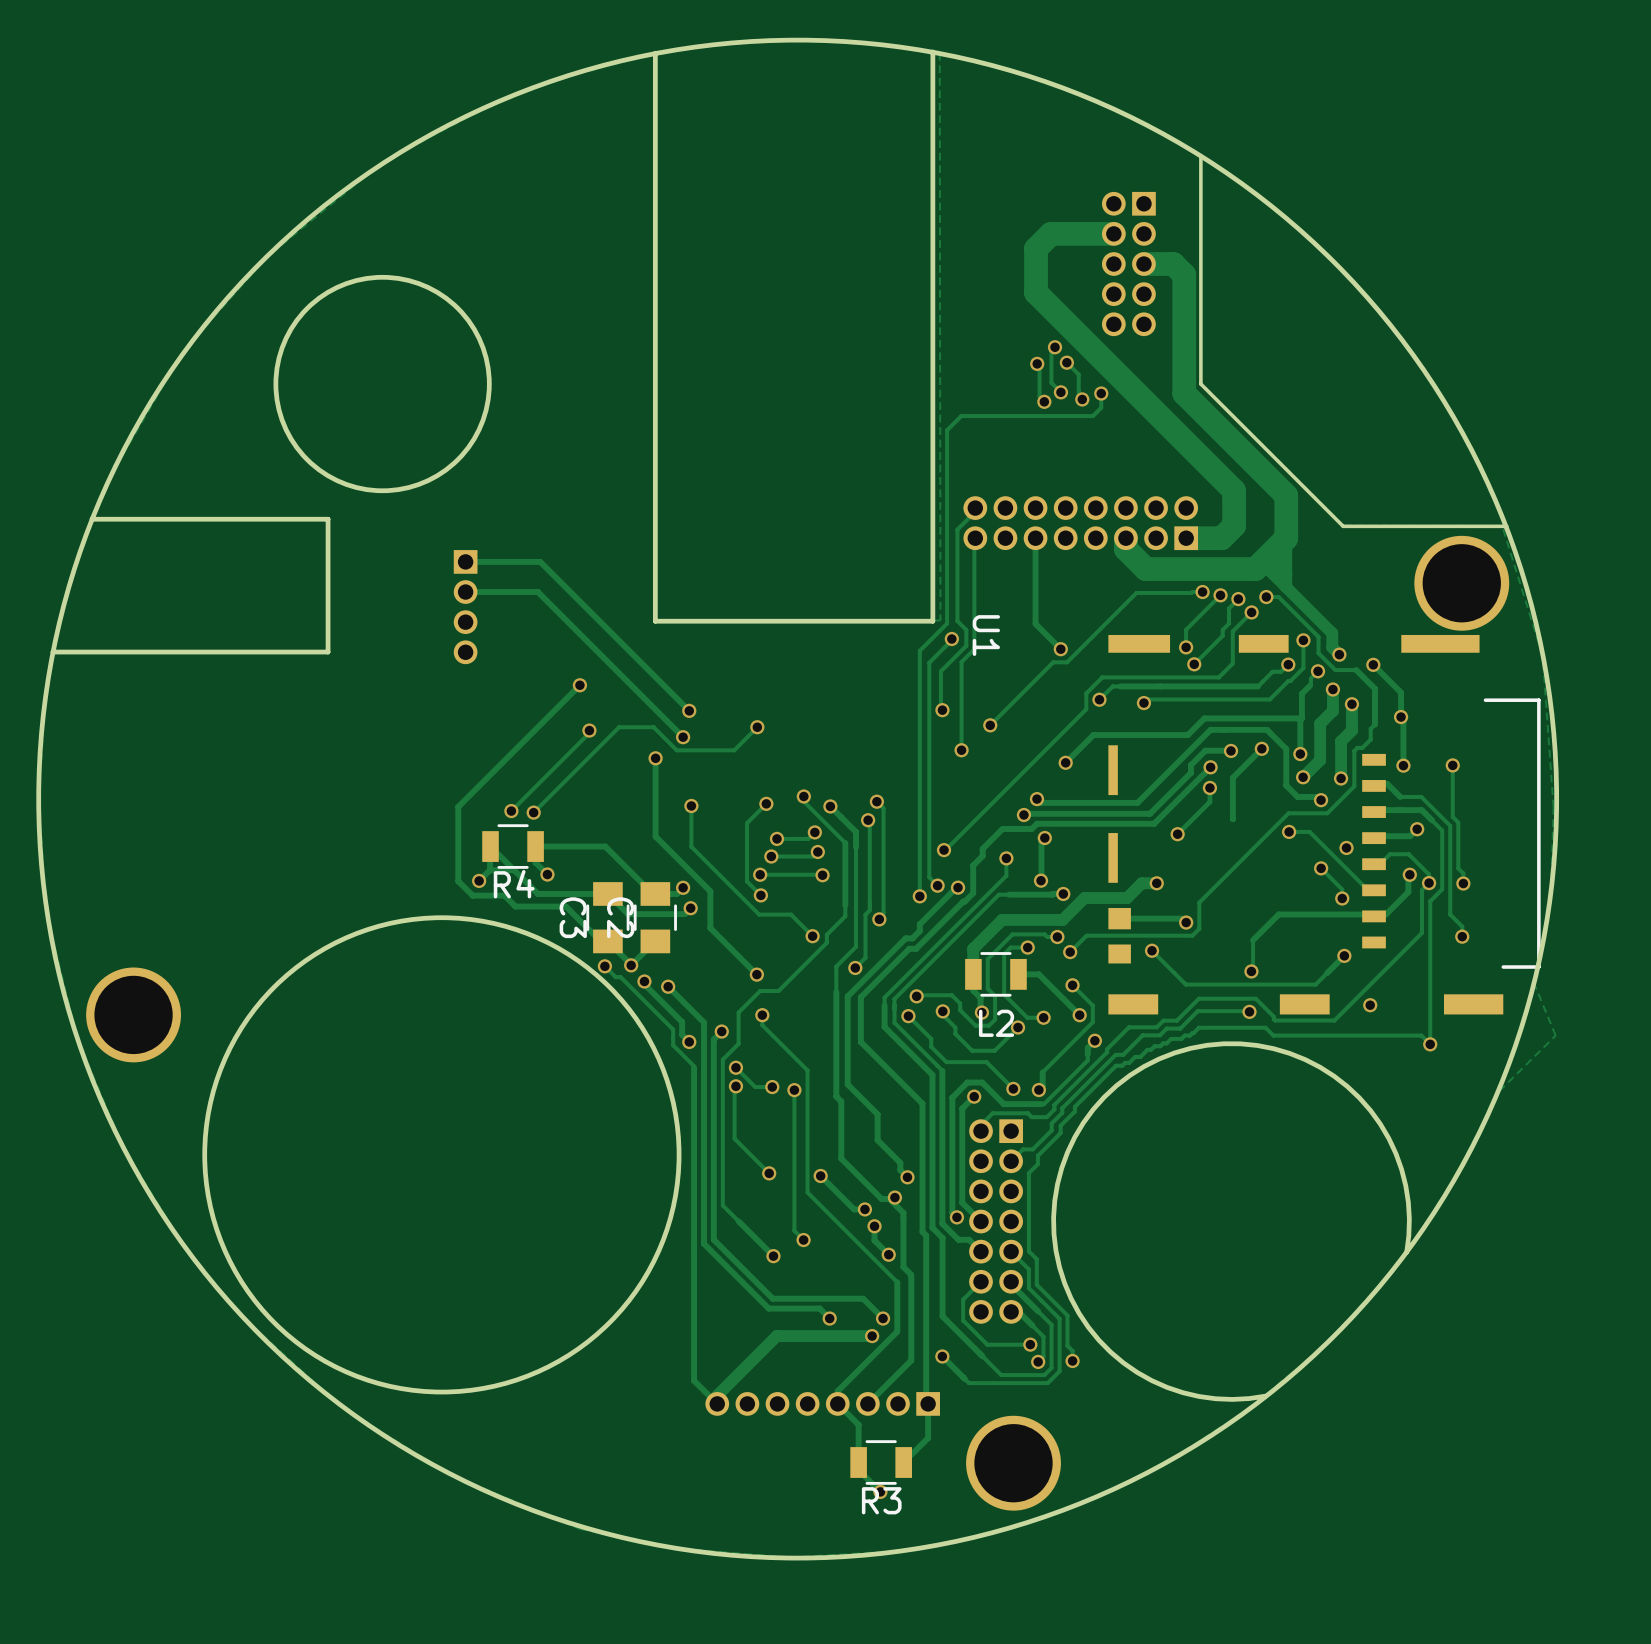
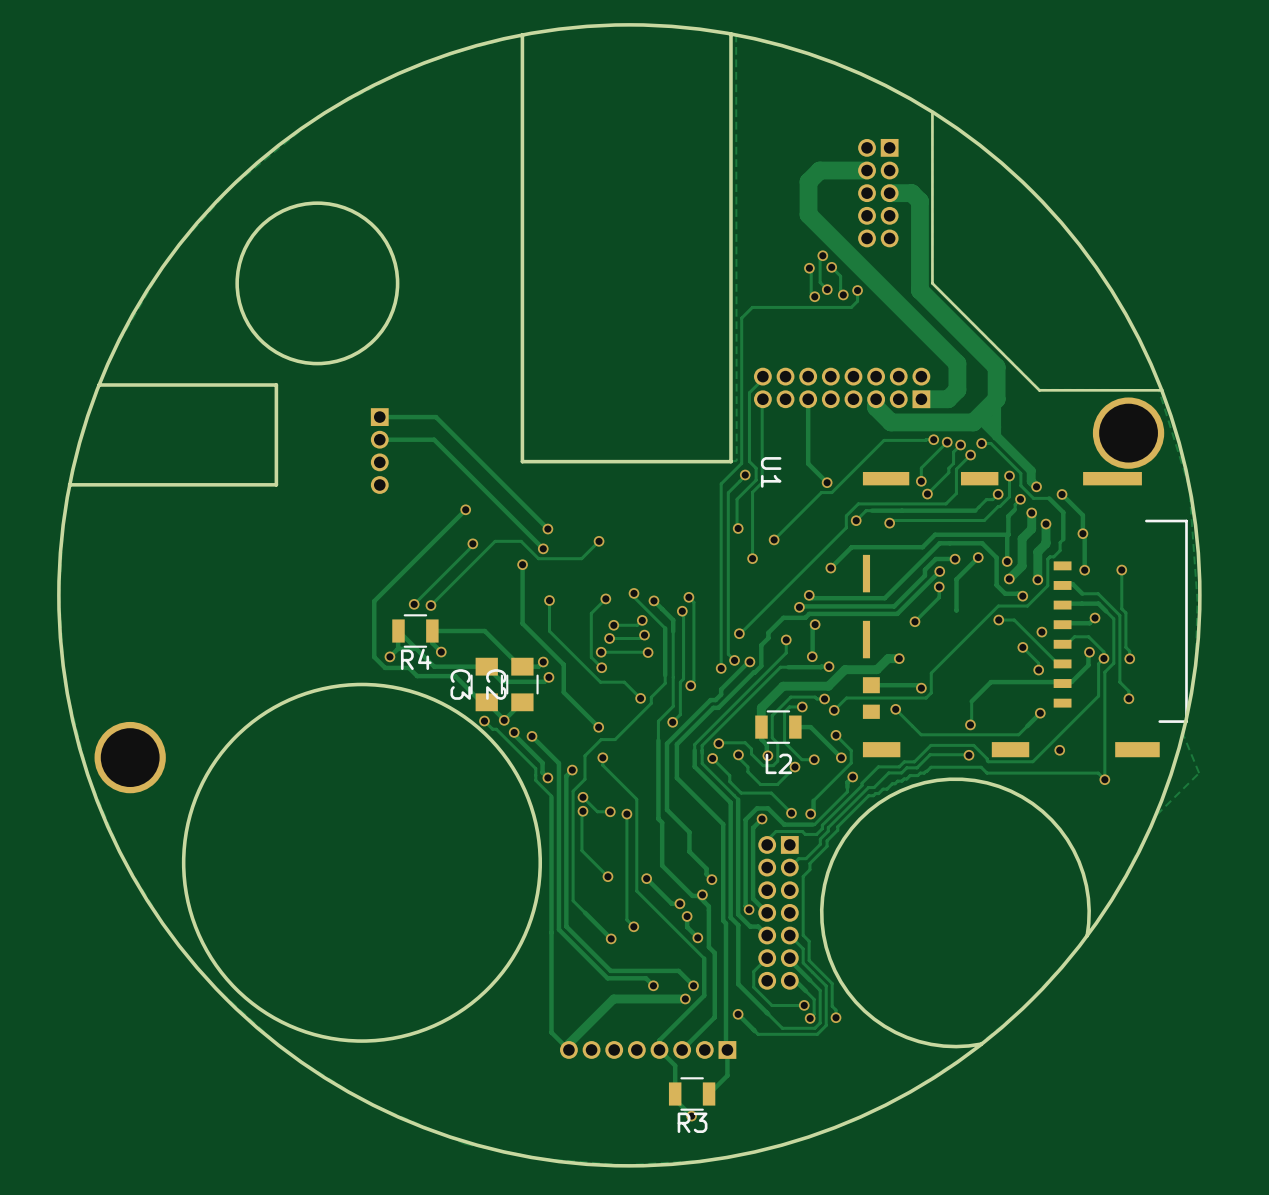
part: (1013, 1463) -> none

